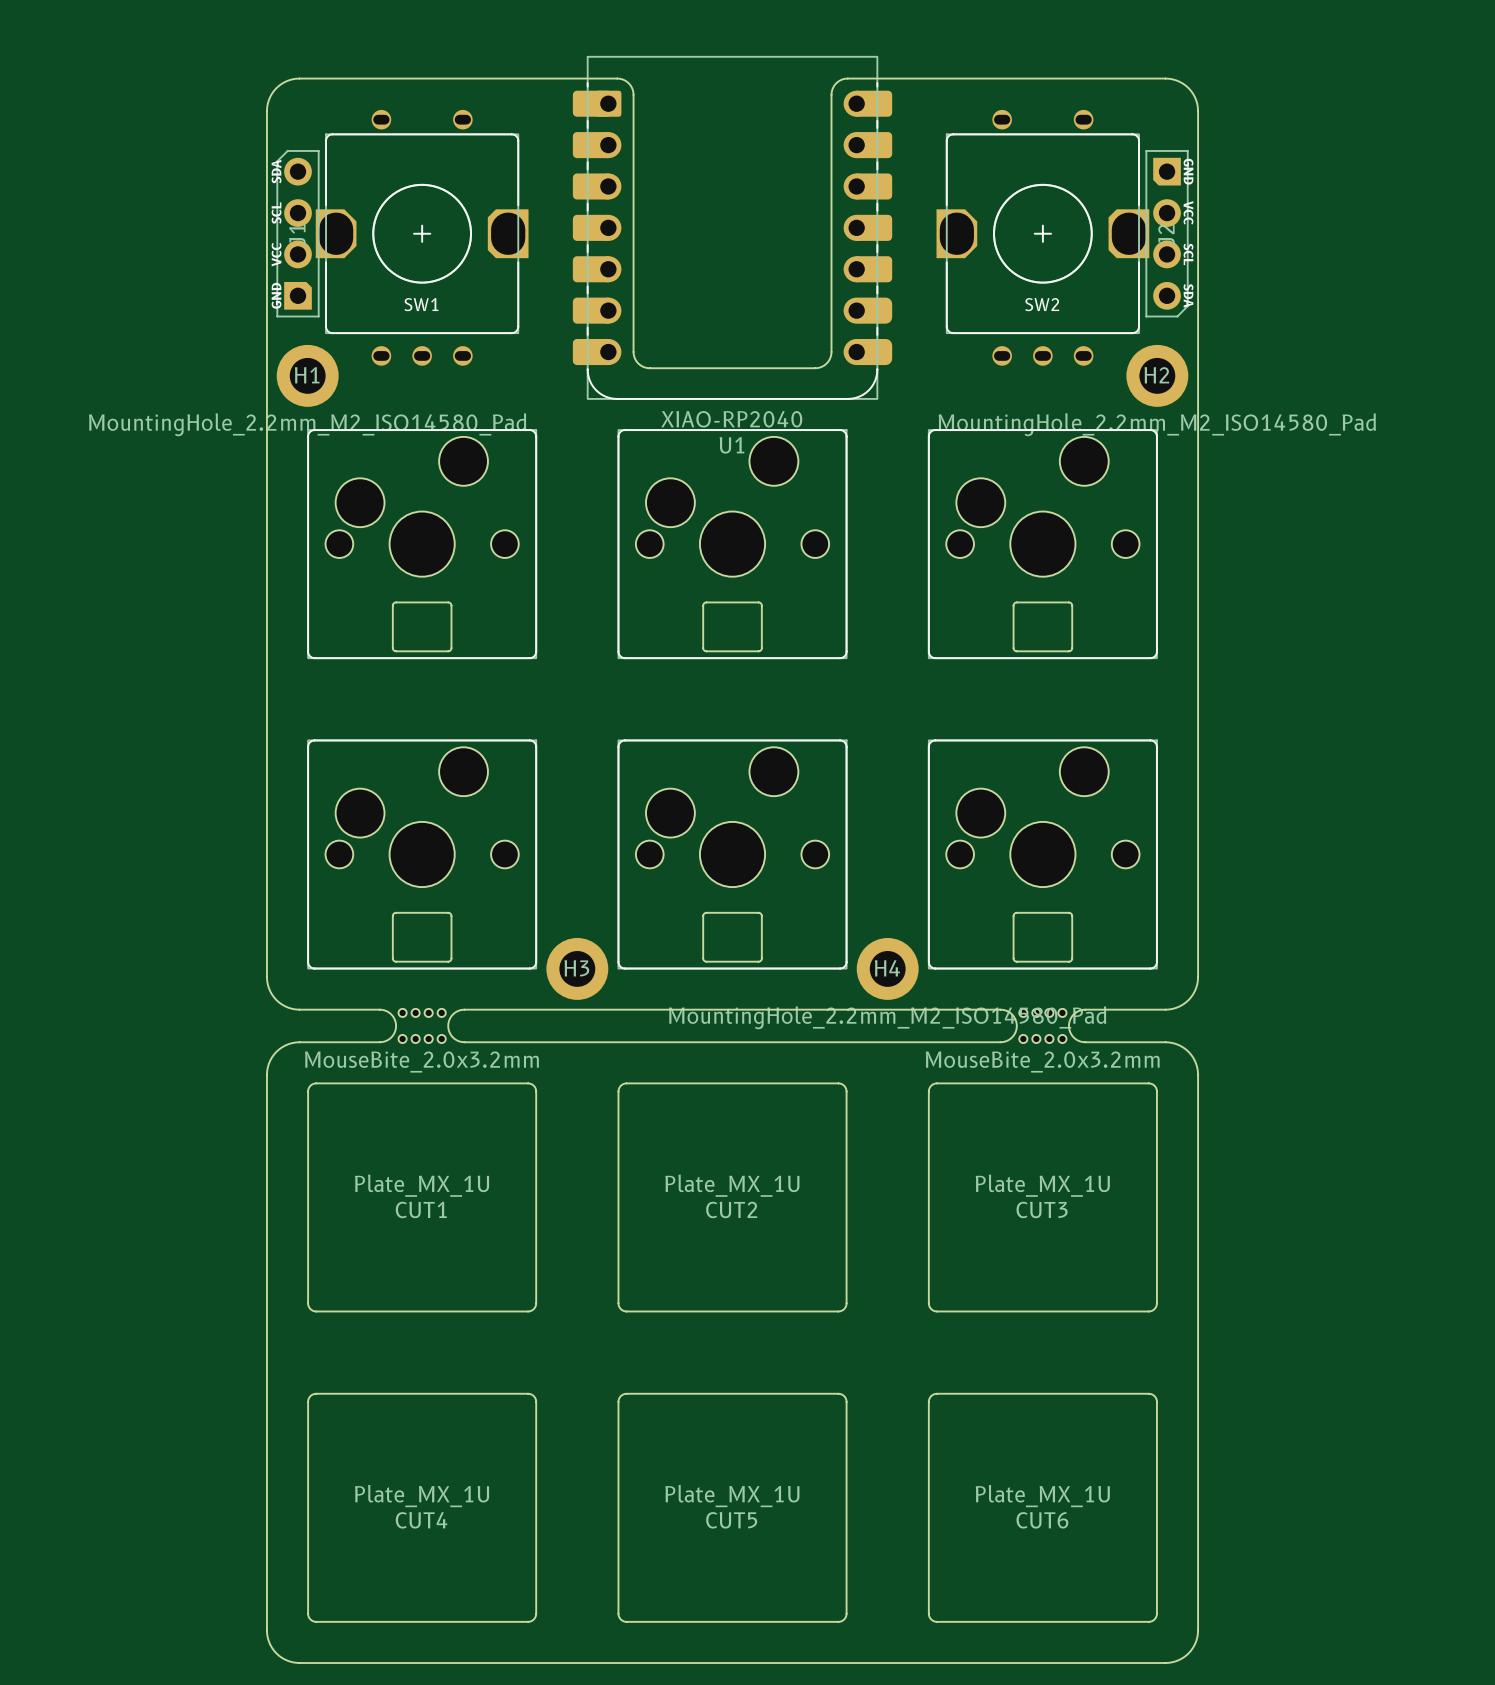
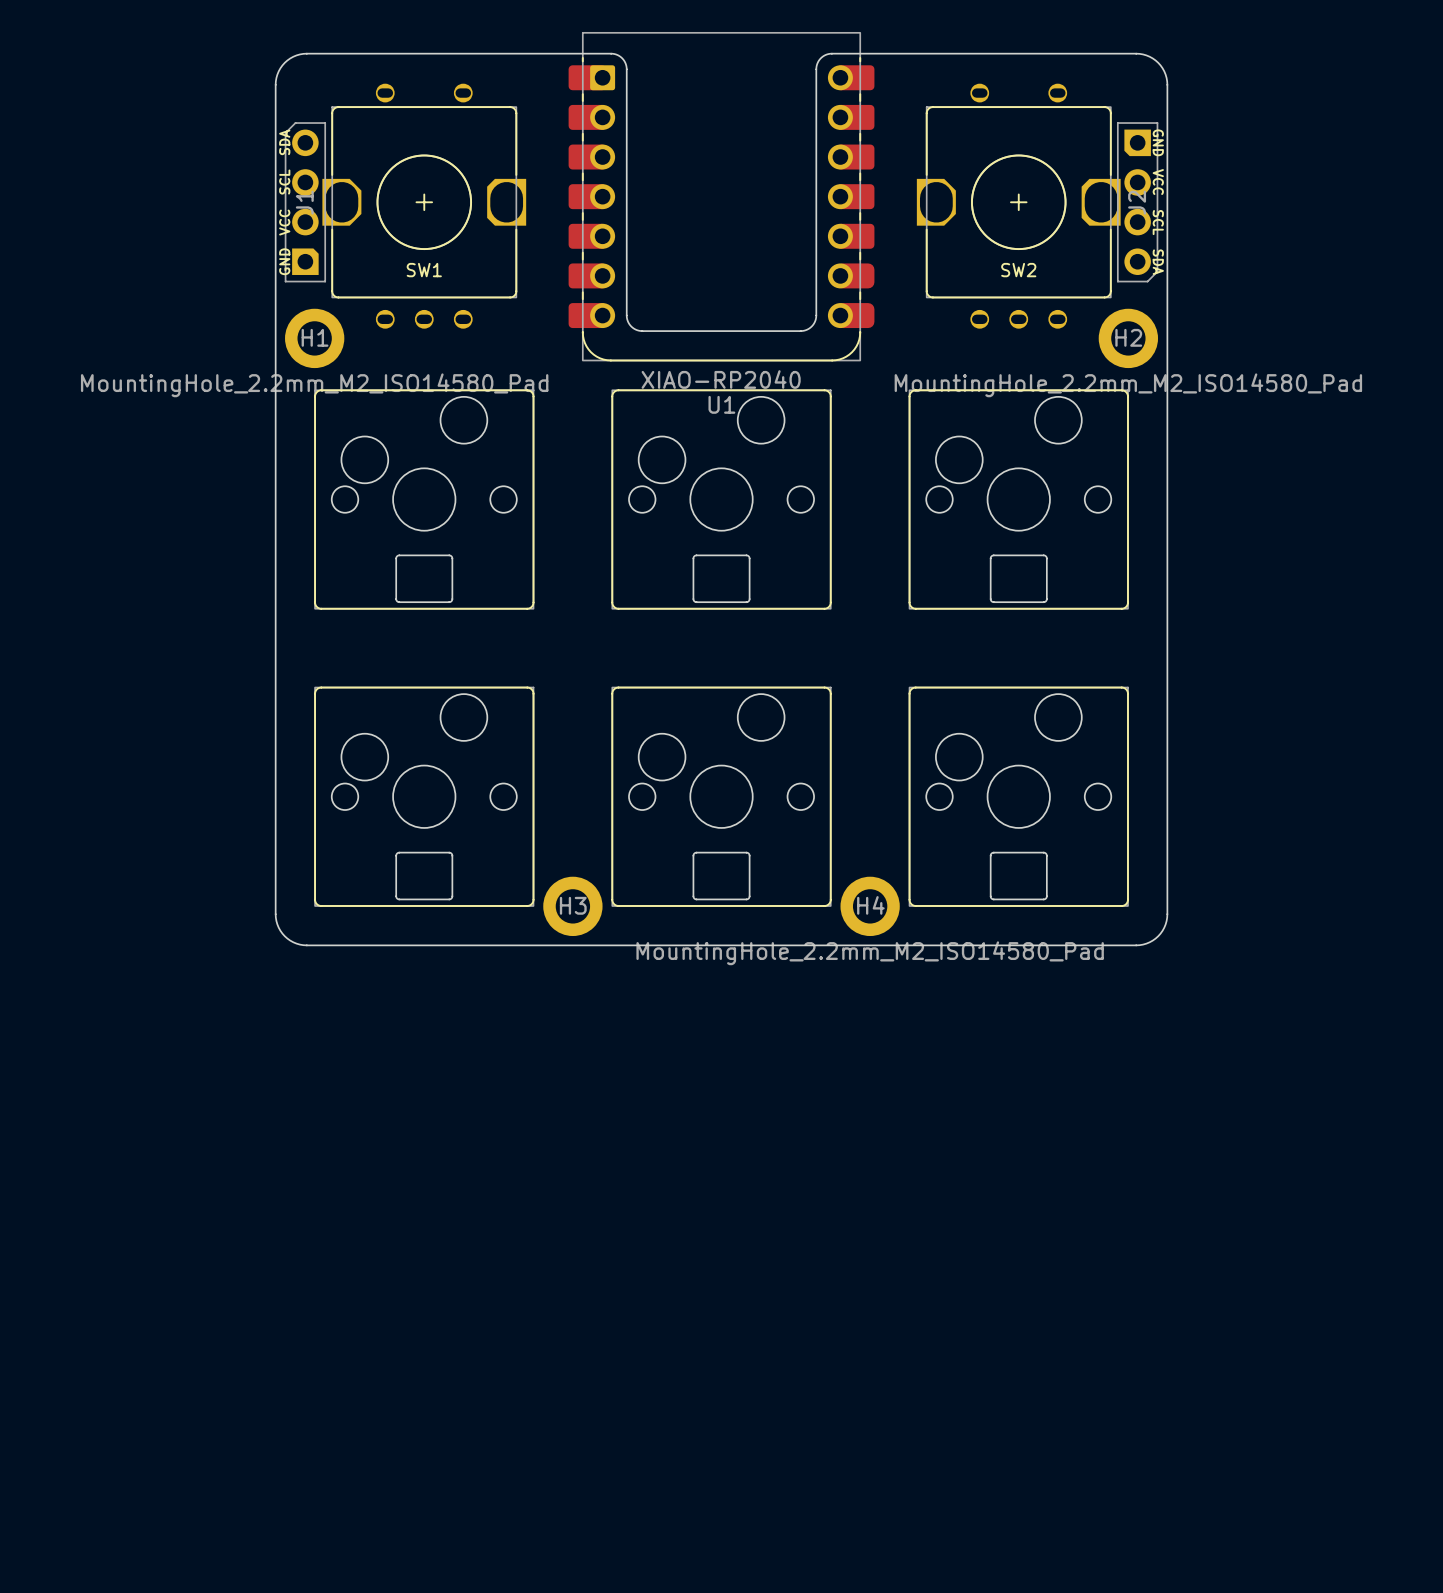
board edge: (379, 1009) (389, 1013) (395, 1021) (394, 1032) (387, 1040) (379, 1042) (292, 1043) (276, 1051) (270, 1060) (267, 1071) (266, 1630) (268, 1641) (274, 1650) (282, 1658) (295, 1662) (1165, 1662) (1176, 1661) (1185, 1655) (1194, 1644) (1198, 1630) (1197, 1071) (1190, 1054) (1182, 1047) (1172, 1043) (1085, 1042) (1077, 1040) (1070, 1032) (1069, 1021) (1075, 1013) (1085, 1009) -> (383, 945) (464, 945)
board edge: (464, 1009) (452, 1014) (448, 1025) (452, 1037) (464, 1042) (1000, 1042) (1012, 1037) (1016, 1025) (1012, 1014) (1000, 1009) -> (1059, 945) (978, 945)
part: MouseBite_2.0x3.2mm (422, 1025) -> none
part: MouseBite_2.0x3.2mm (1042, 1025) -> none
CUT1: Plate_MX_1U (422, 1197) -> none
CUT2: Plate_MX_1U (732, 1197) -> none
CUT3: Plate_MX_1U (1042, 1197) -> none
CUT4: Plate_MX_1U (422, 1507) -> none
CUT5: Plate_MX_1U (732, 1507) -> none
CUT6: Plate_MX_1U (1042, 1507) -> none

